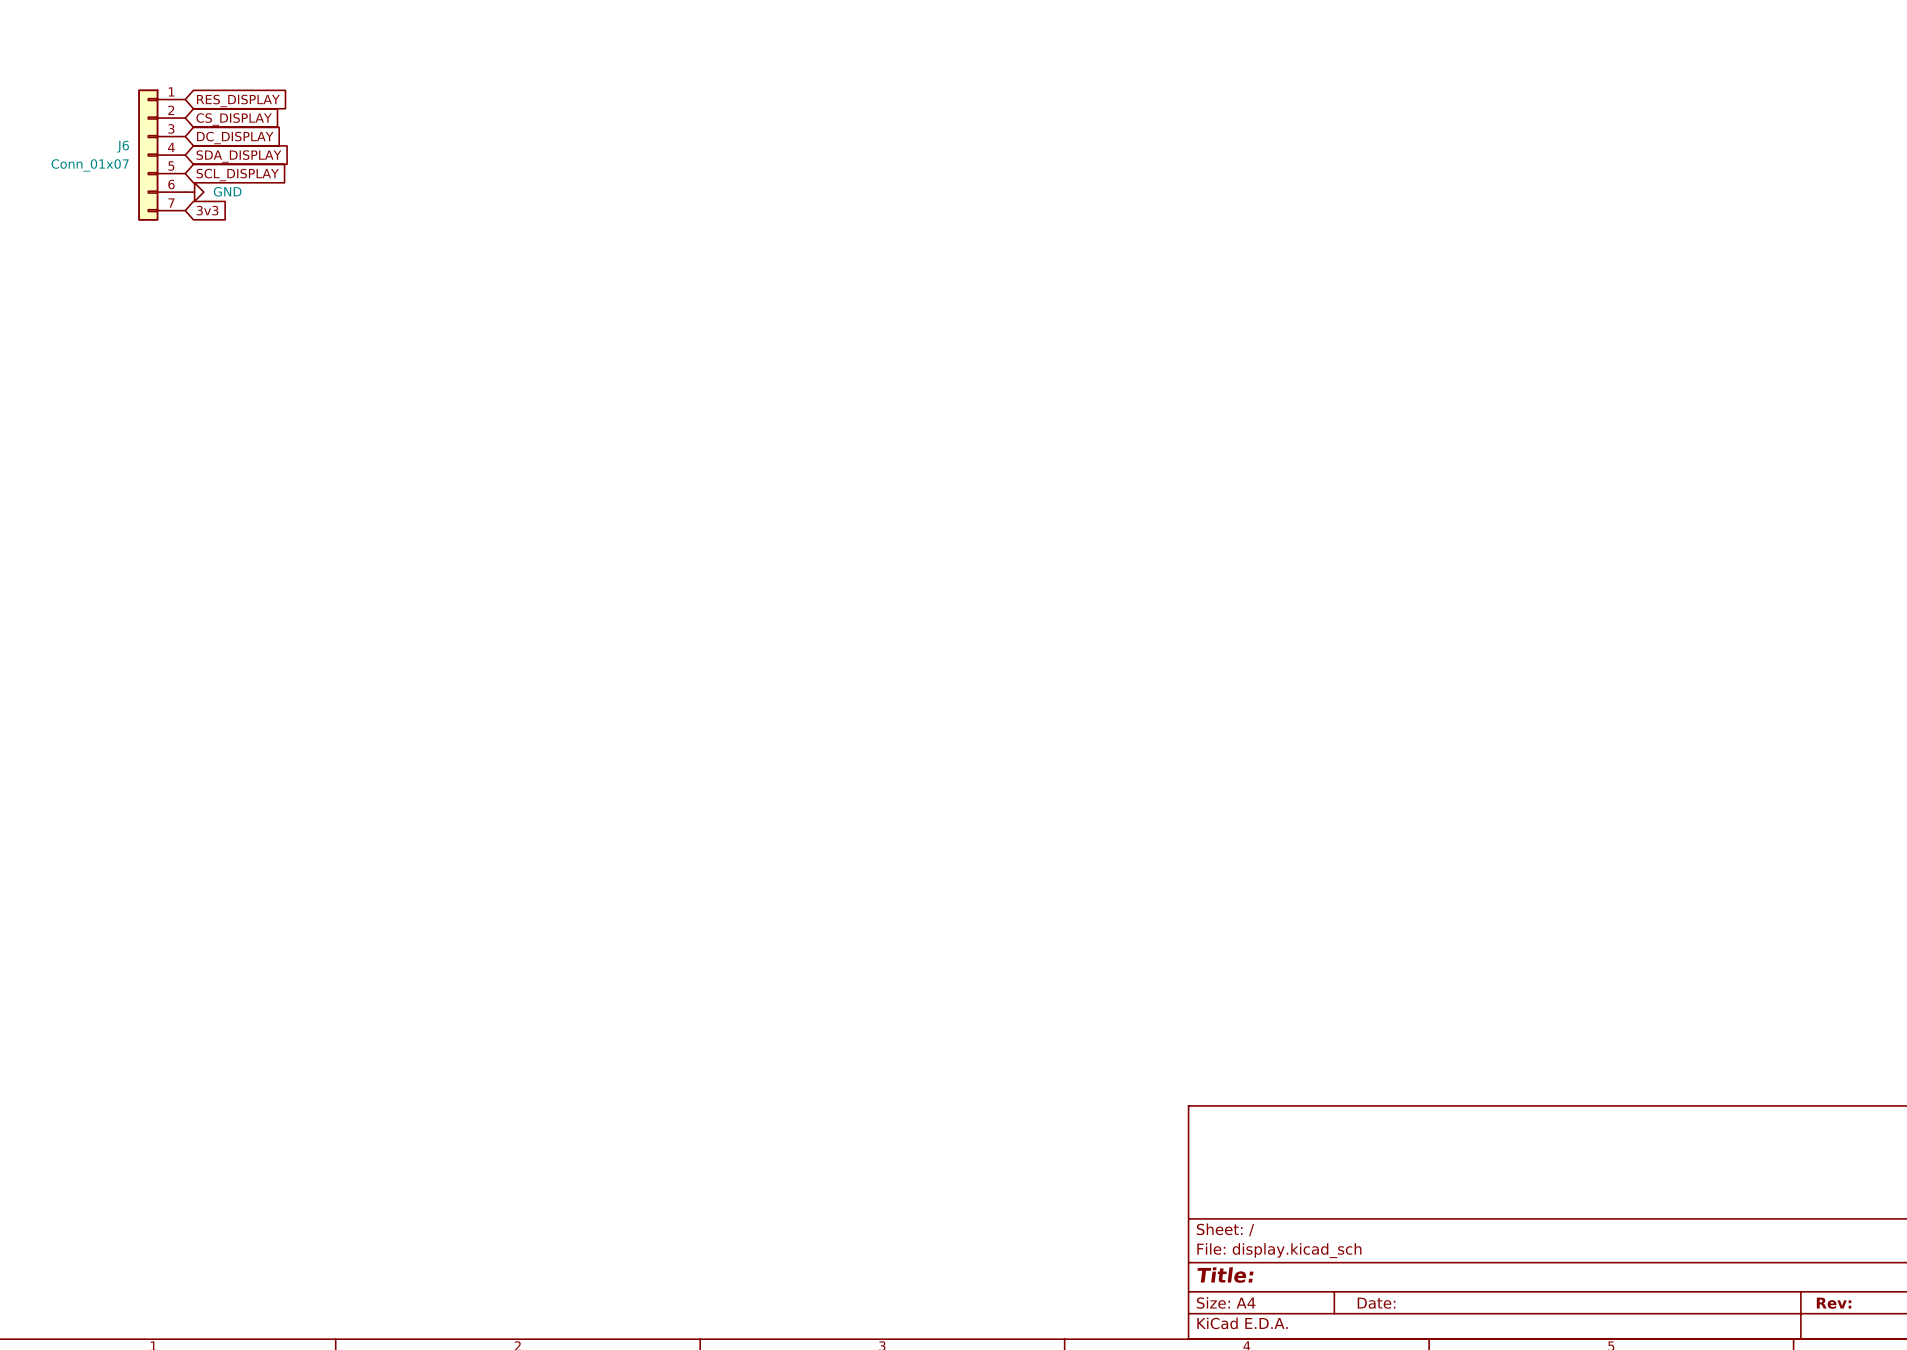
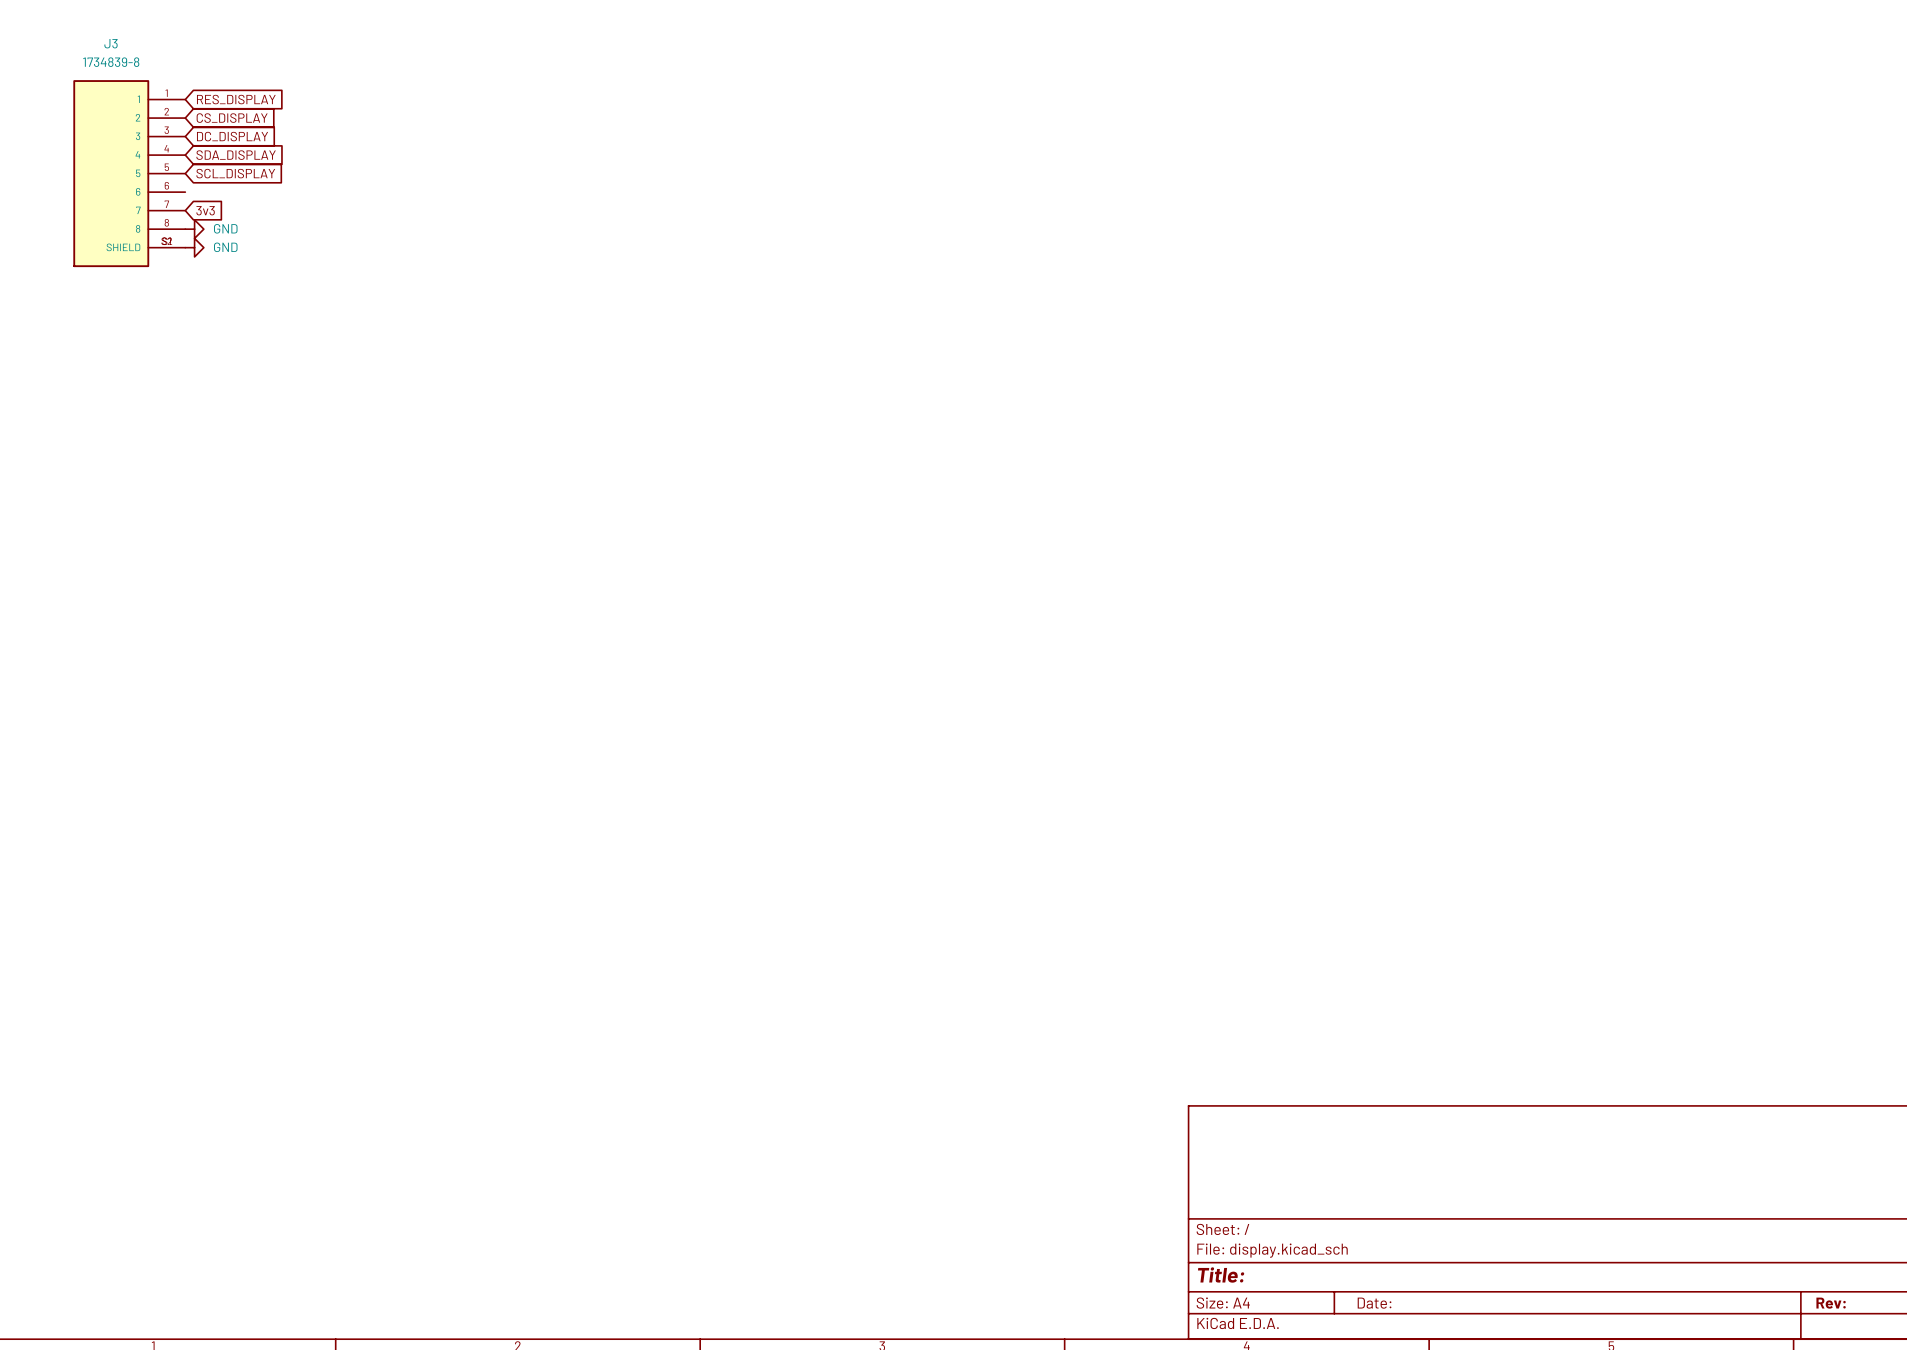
J6: Conn_01x07 (161, 155) -> none
J3: none -> 1734839-8 (129, 173)
power symbol: GND (194, 192) -> none
power symbol: none -> GND (194, 229)
power symbol: none -> GND (194, 247)

